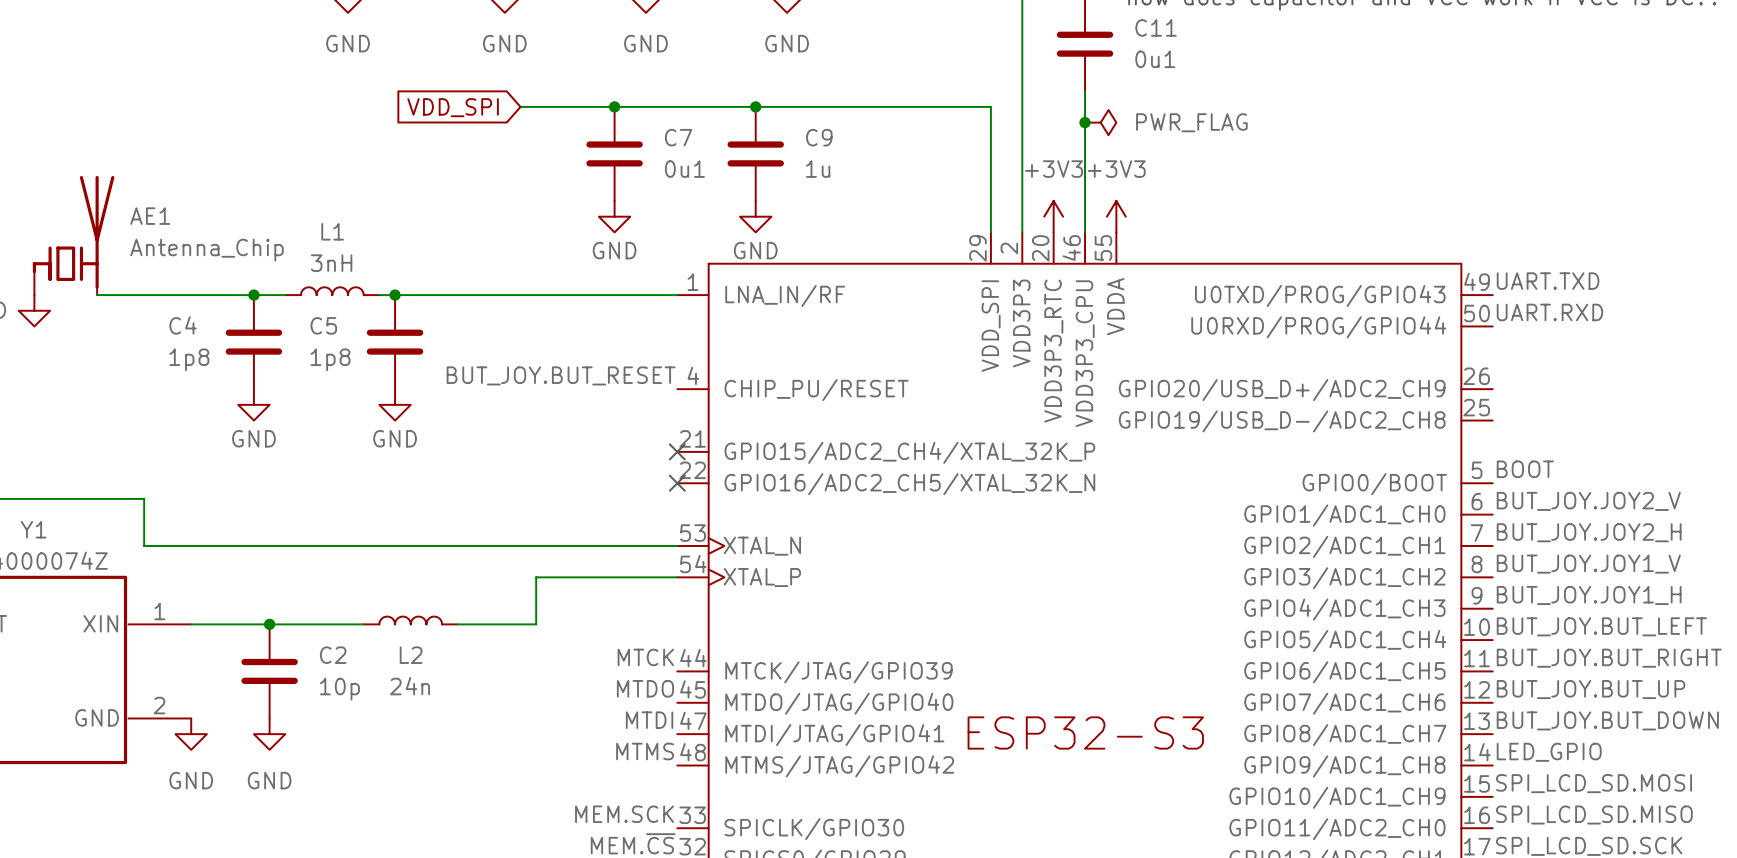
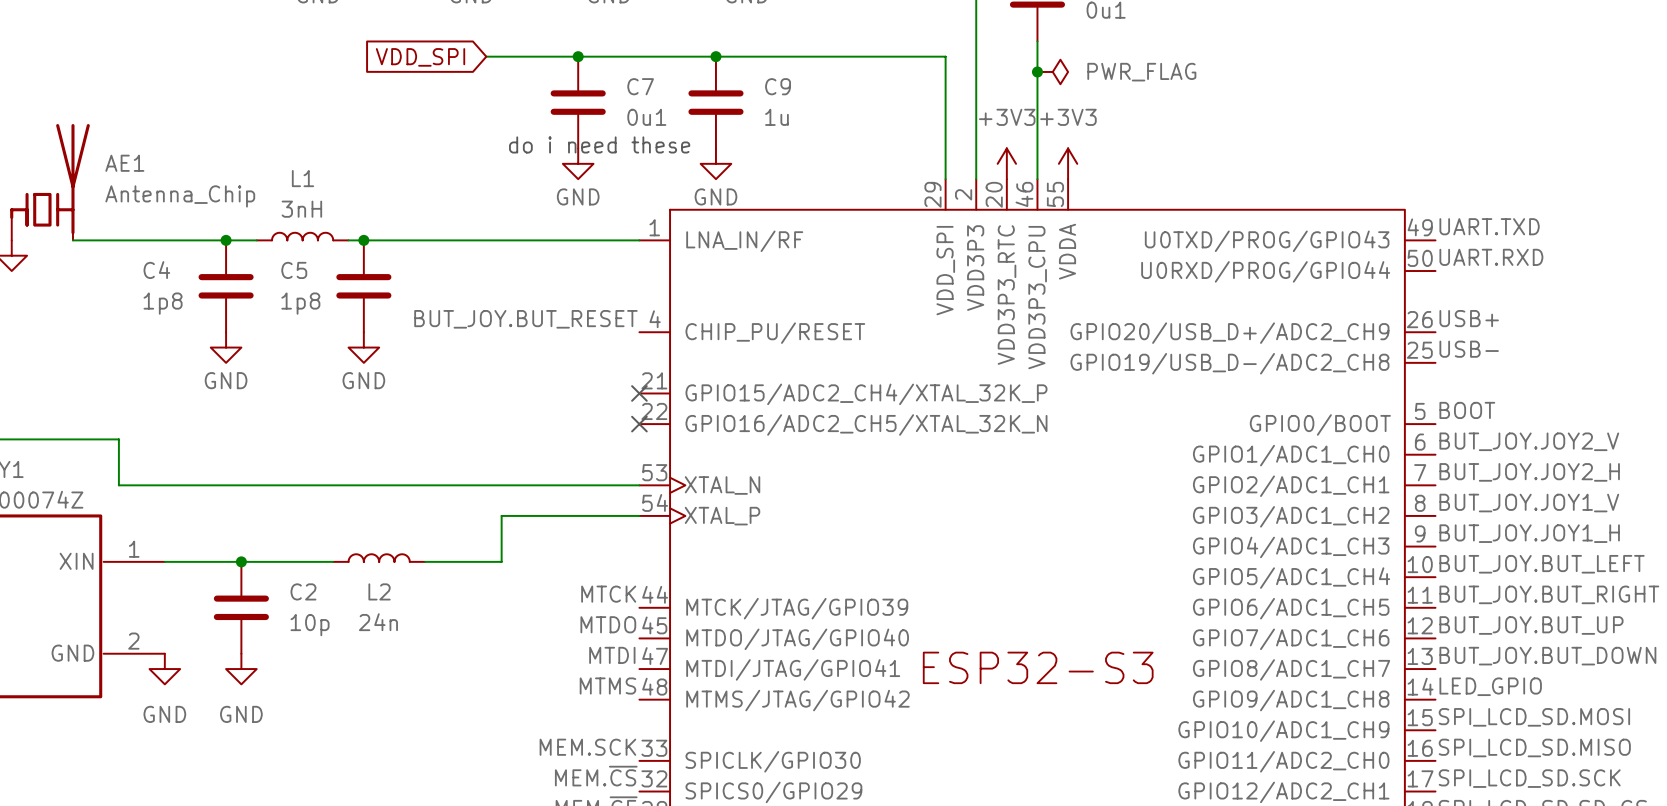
text: none -> do i need these (599, 144)
label: none -> USB+ (1469, 318)
label: none -> USB- (1469, 349)

